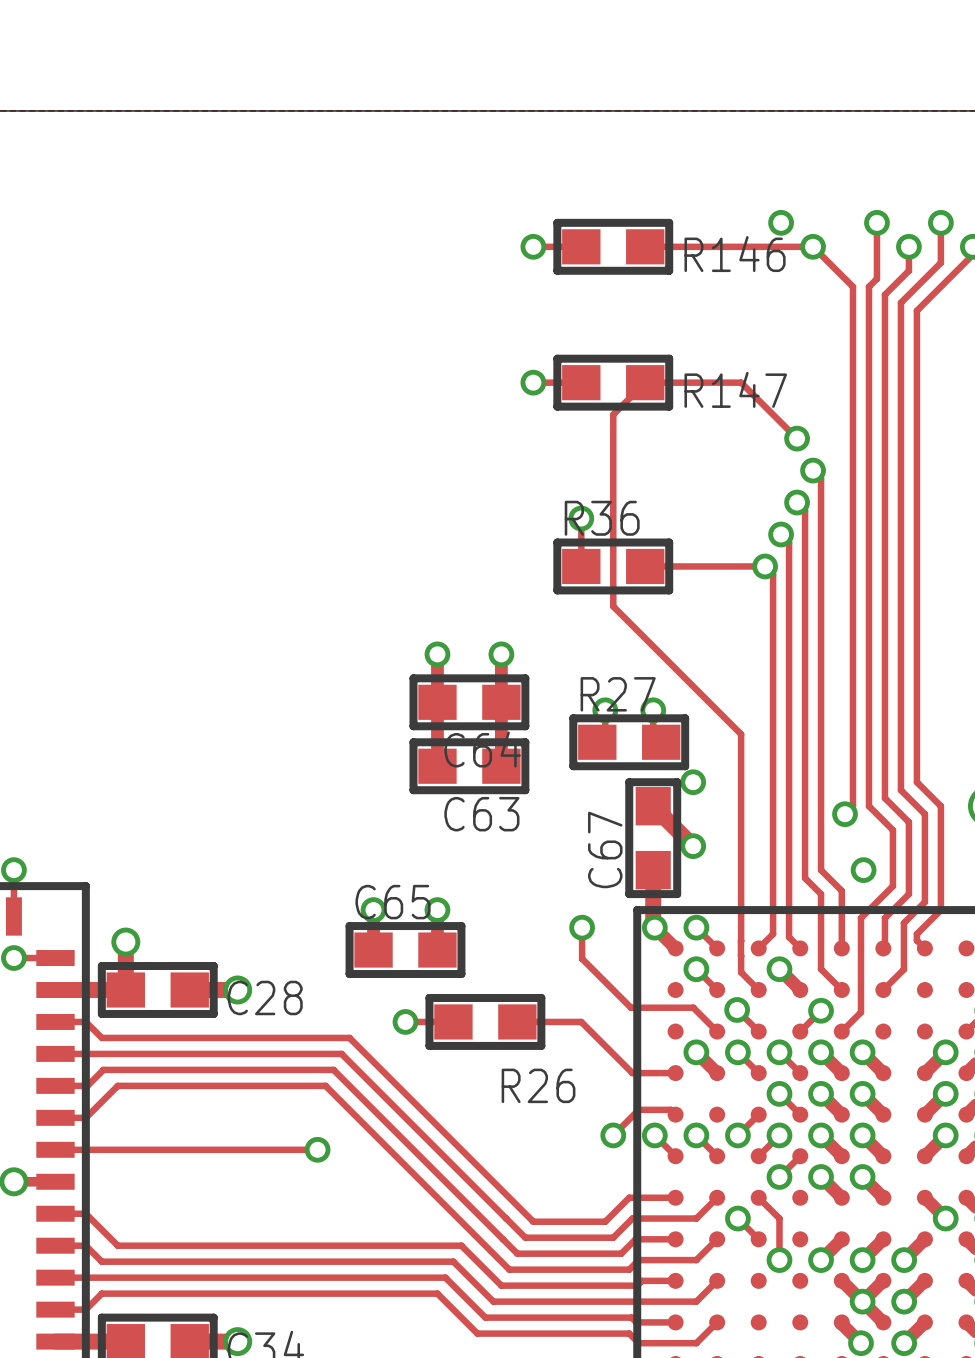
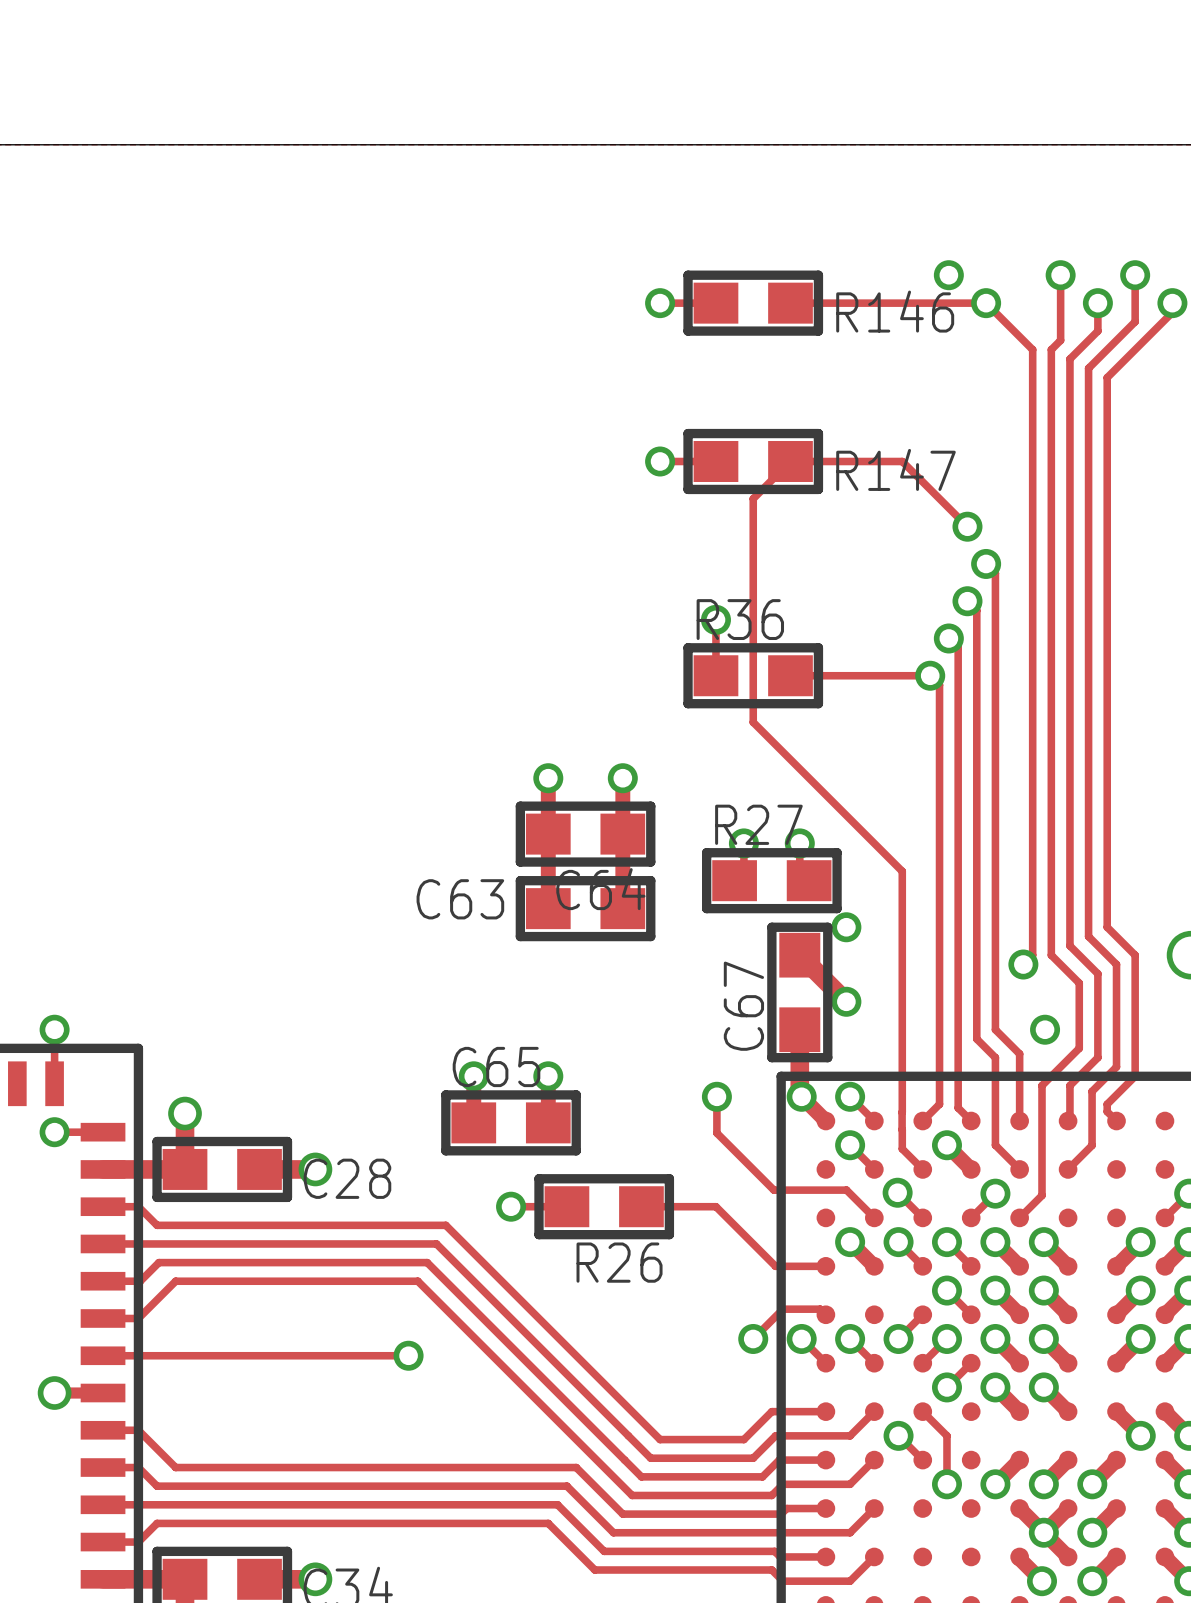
C63 name position: C63 (481, 814) -> C63 (460, 899)
R26 name position: R26 (538, 1085) -> R26 (619, 1262)

